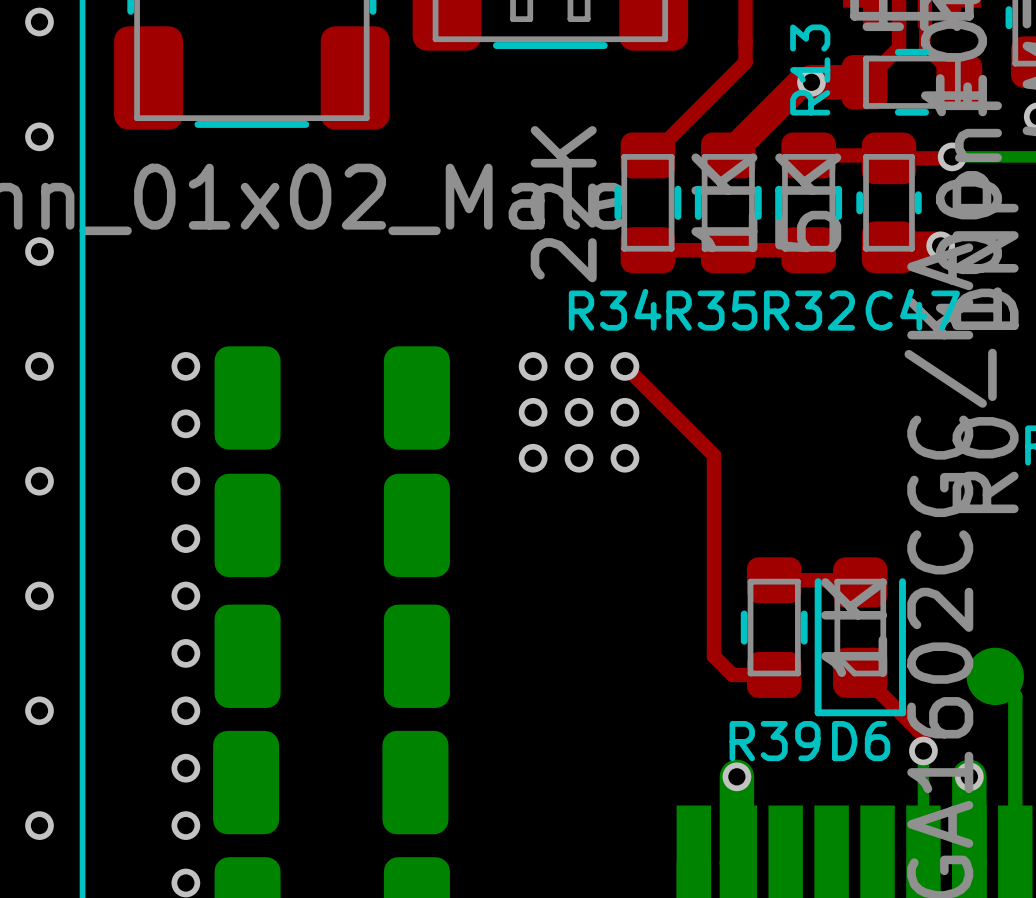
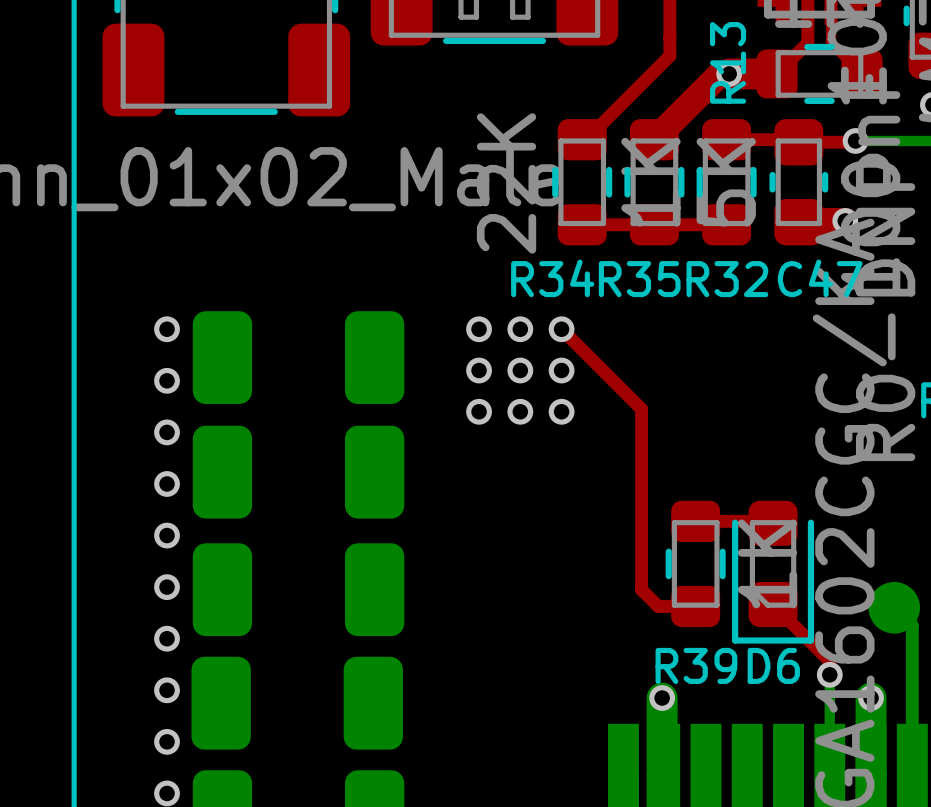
via: (39, 22) -> none
via: (39, 136) -> none
via: (39, 251) -> none
via: (39, 366) -> none
via: (39, 481) -> none
via: (39, 596) -> none
via: (39, 710) -> none
via: (39, 825) -> none

